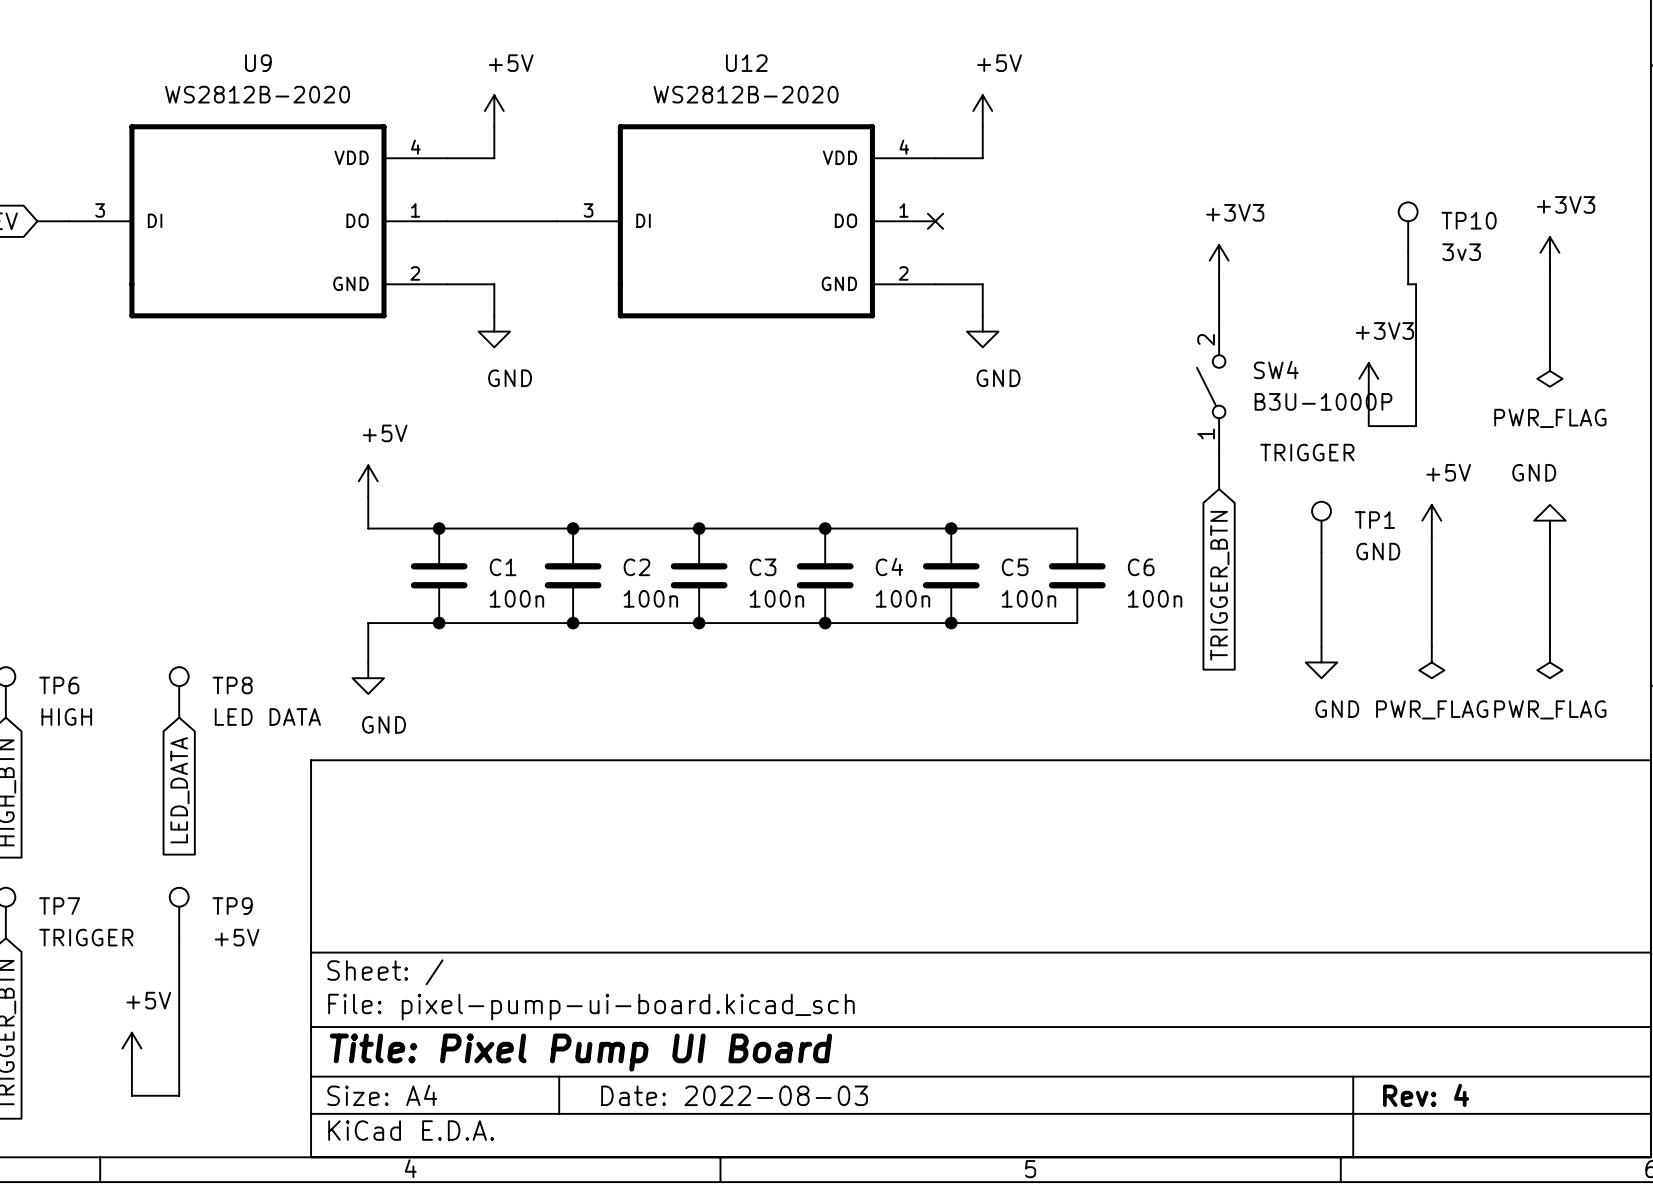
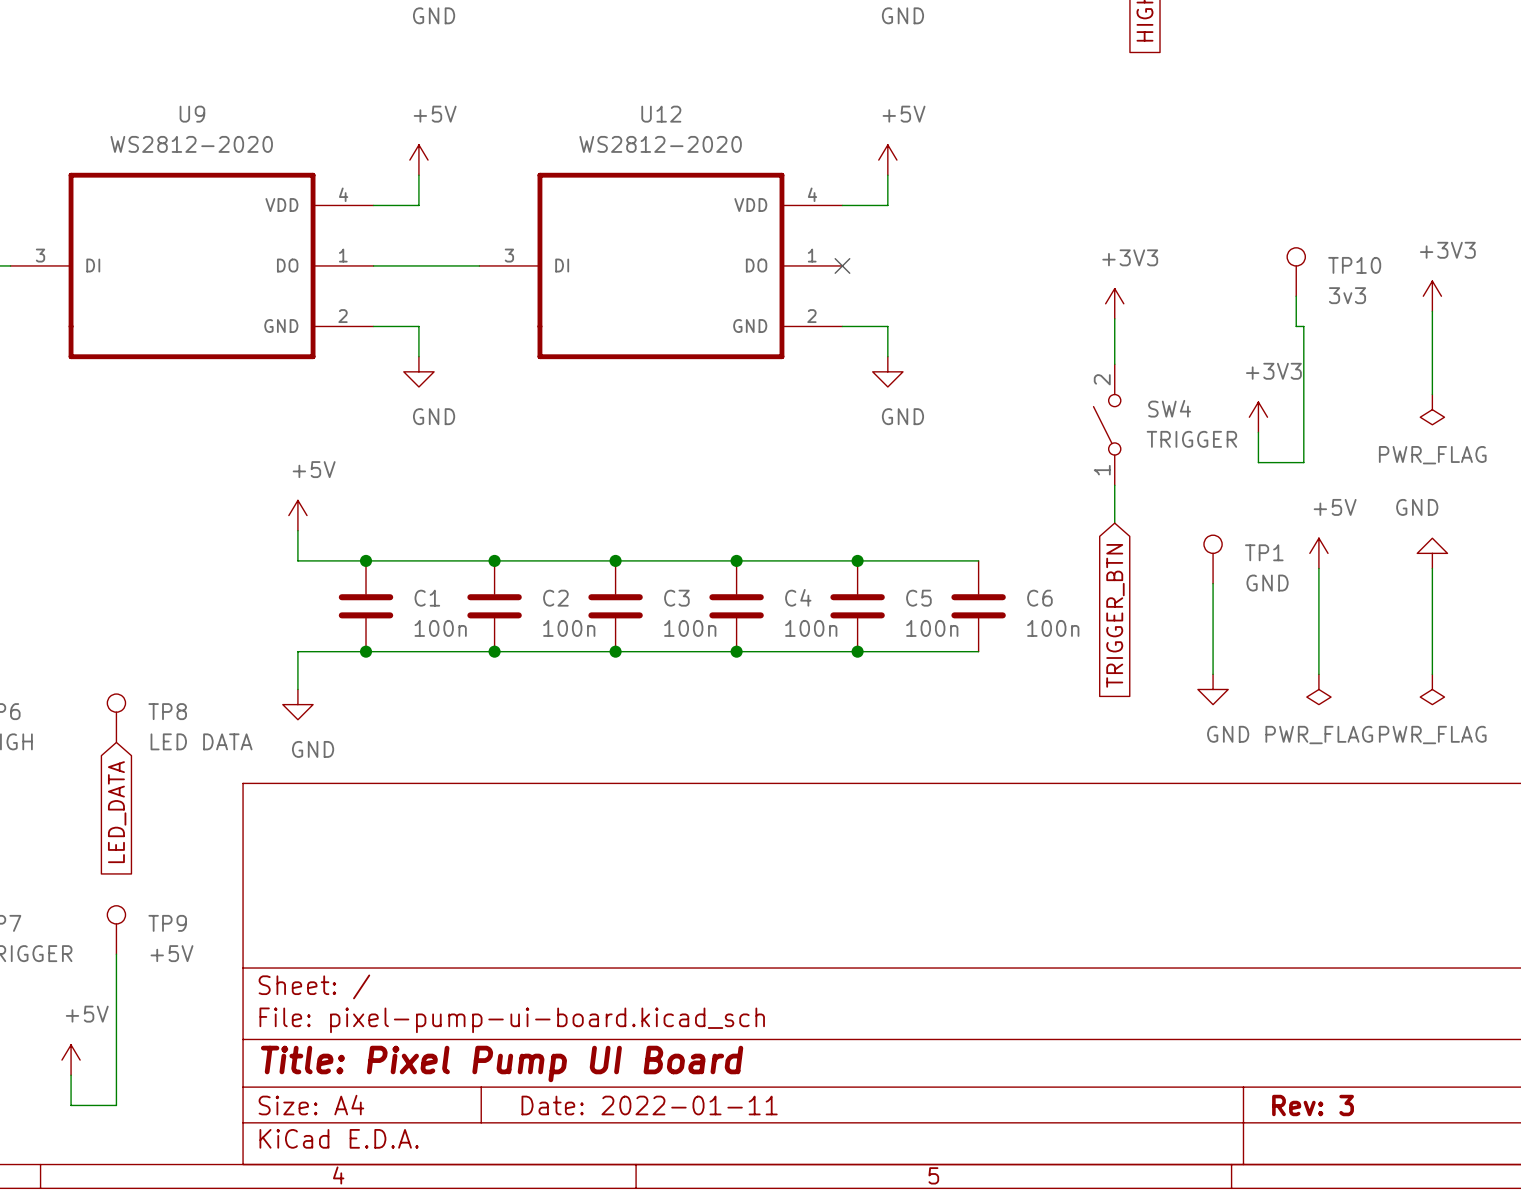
U9 value: WS2812B-2020 (257, 94) -> WS2812-2020 (191, 144)
U12 value: WS2812B-2020 (746, 94) -> WS2812-2020 (660, 144)
SW4 value: B3U-1000P (1323, 401) -> TRIGGER (1191, 439)
text: TRIGGER (1307, 452) -> none
title block: Date: 2022-08-03 (734, 1095) -> Date: 2022-01-11 (649, 1105)
title block: Rev: 4 (1426, 1095) -> Rev: 3 (1313, 1105)

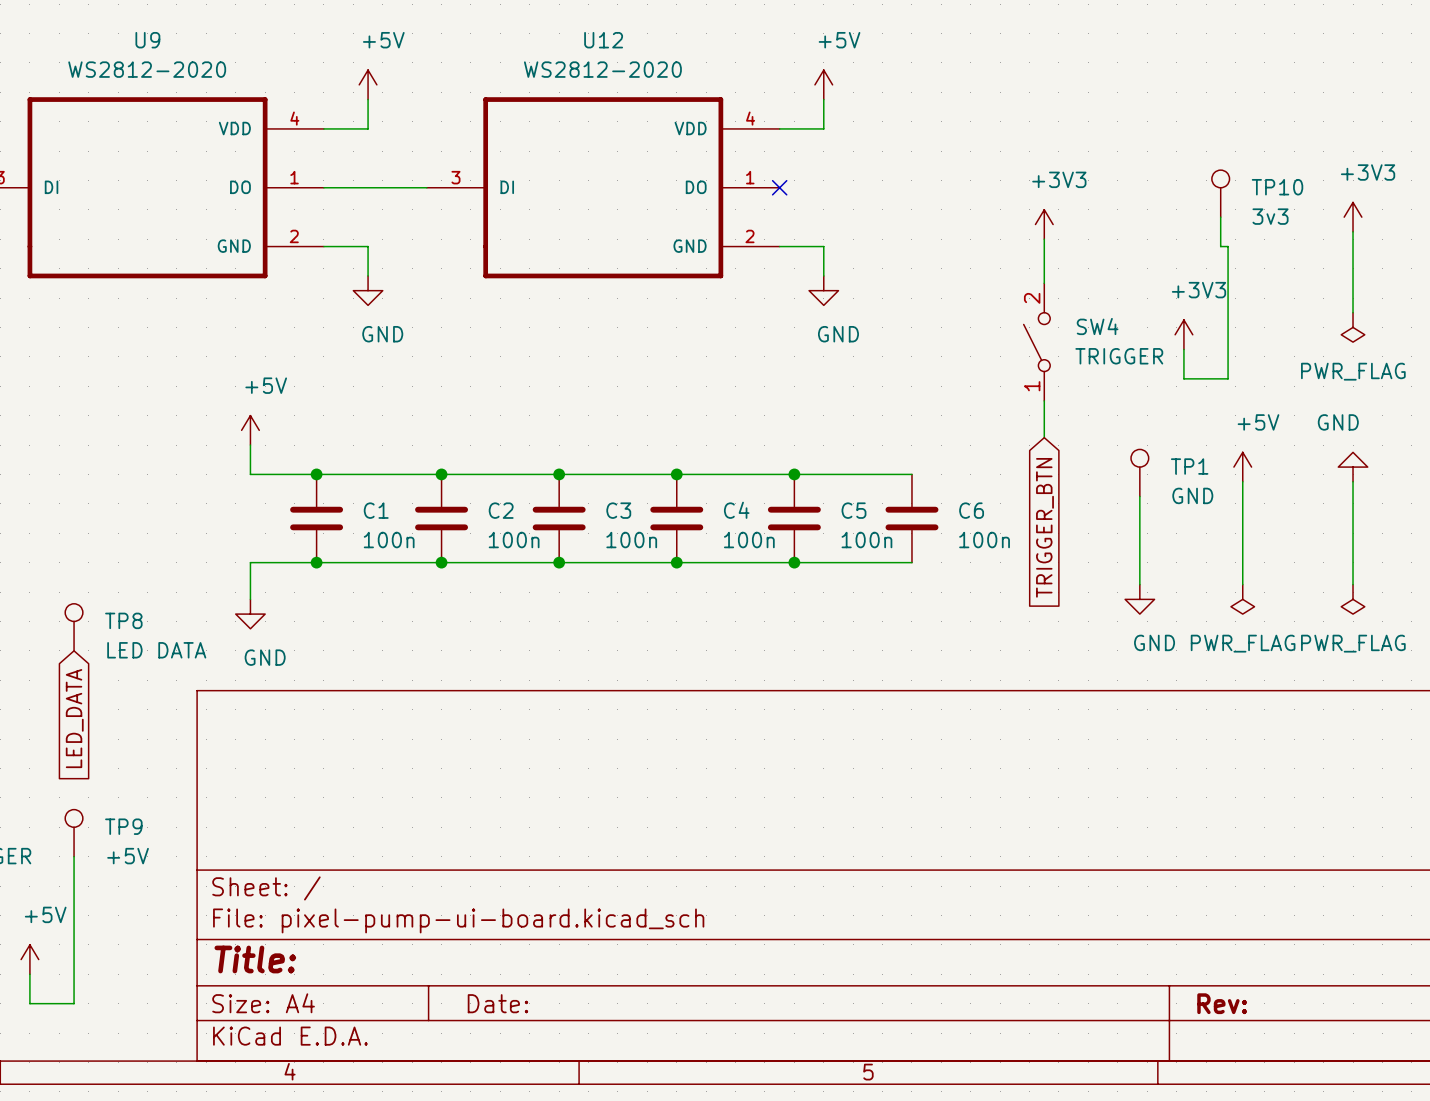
title block: Title: Pixel Pump UI Board (502, 1063) -> Title: (255, 959)
title block: Date: 2022-01-11 (649, 1105) -> Date: (497, 1003)
title block: Rev: 3 (1313, 1105) -> Rev: (1222, 1003)

